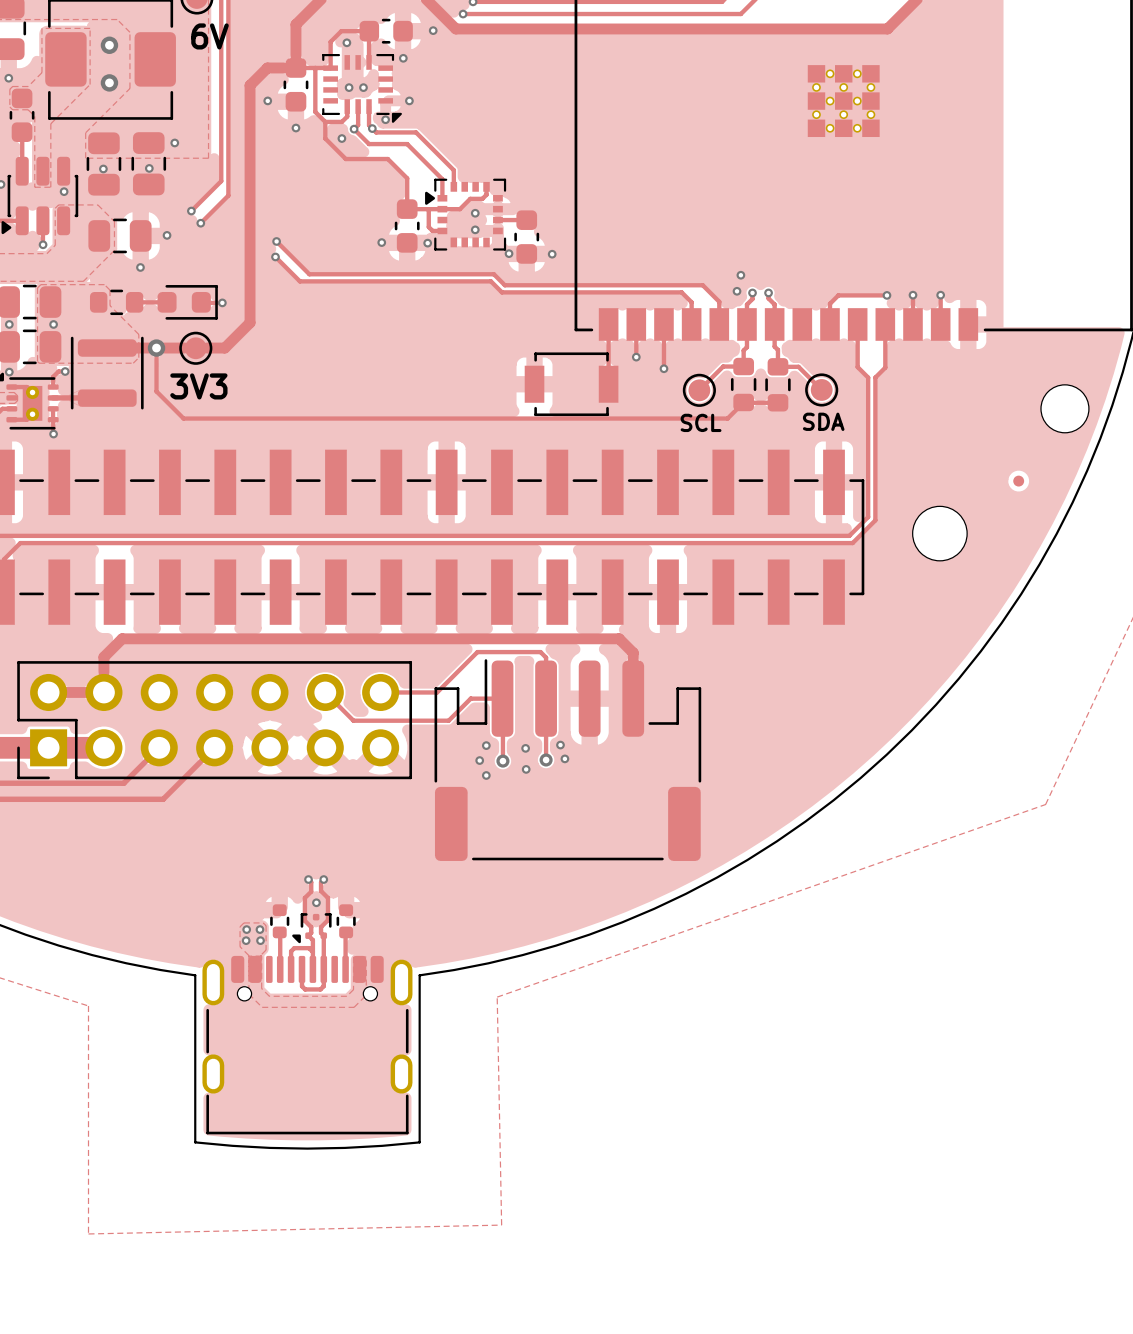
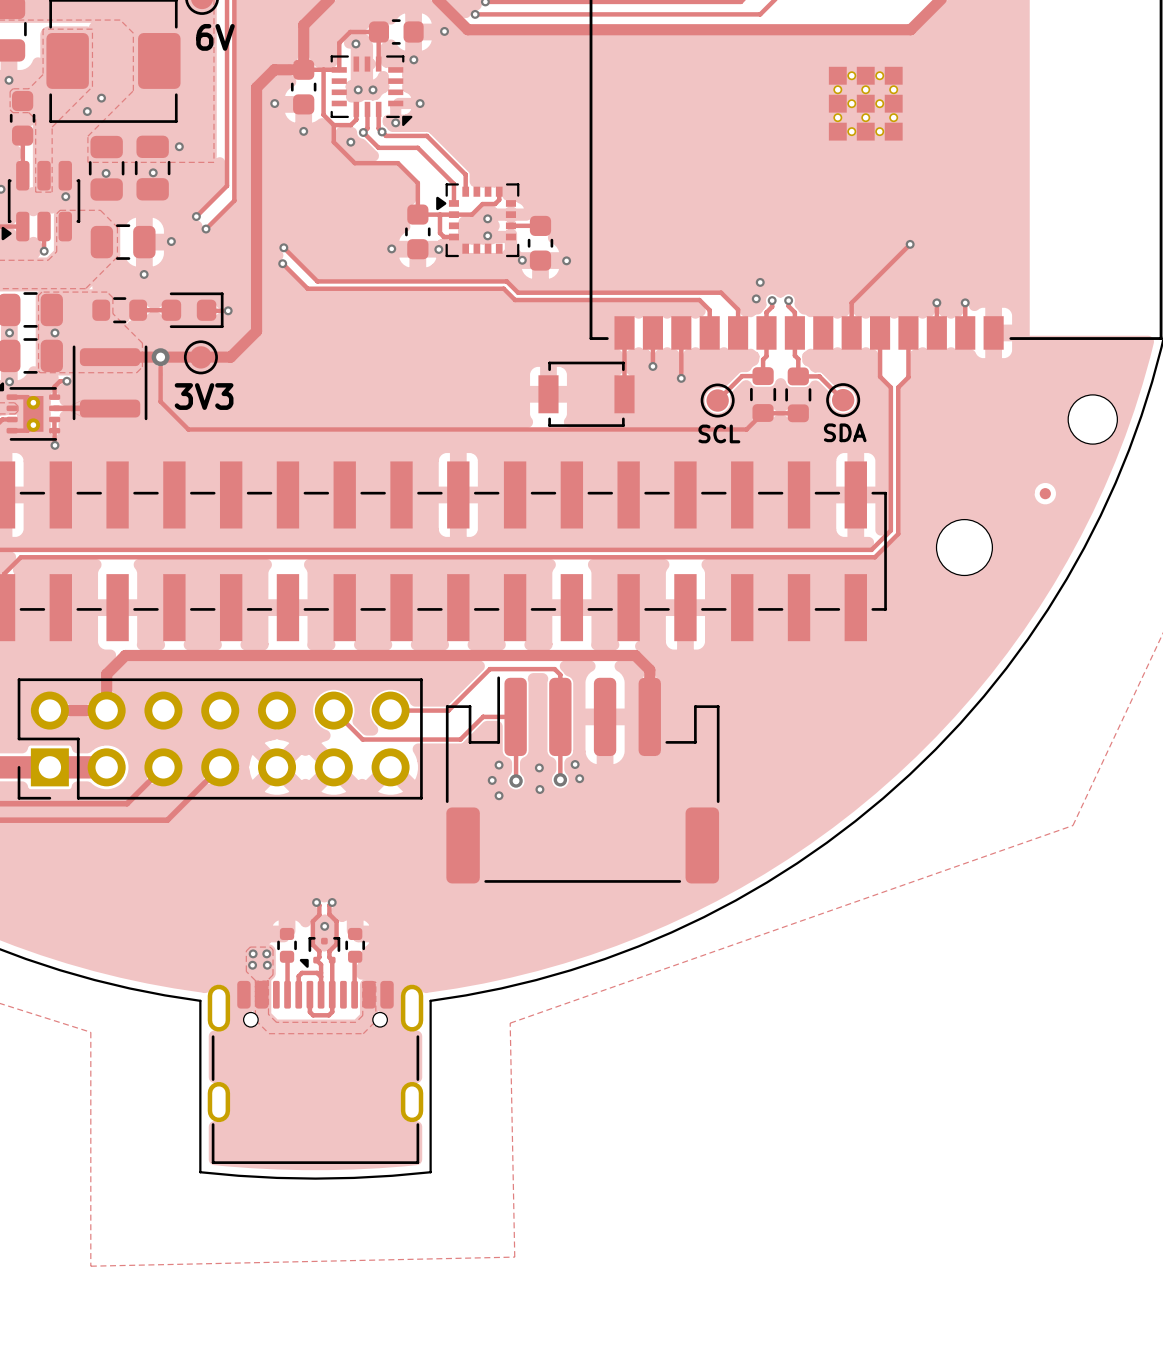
via: (109, 45) -> none
via size: [100, 74, 119, 92] -> [97, 93, 106, 103]
via: none -> (87, 111)
track: (886, 295) (838, 295) (829, 303) -> (910, 244) (851, 302) (851, 311)
via position: (886, 295) -> (910, 244)

